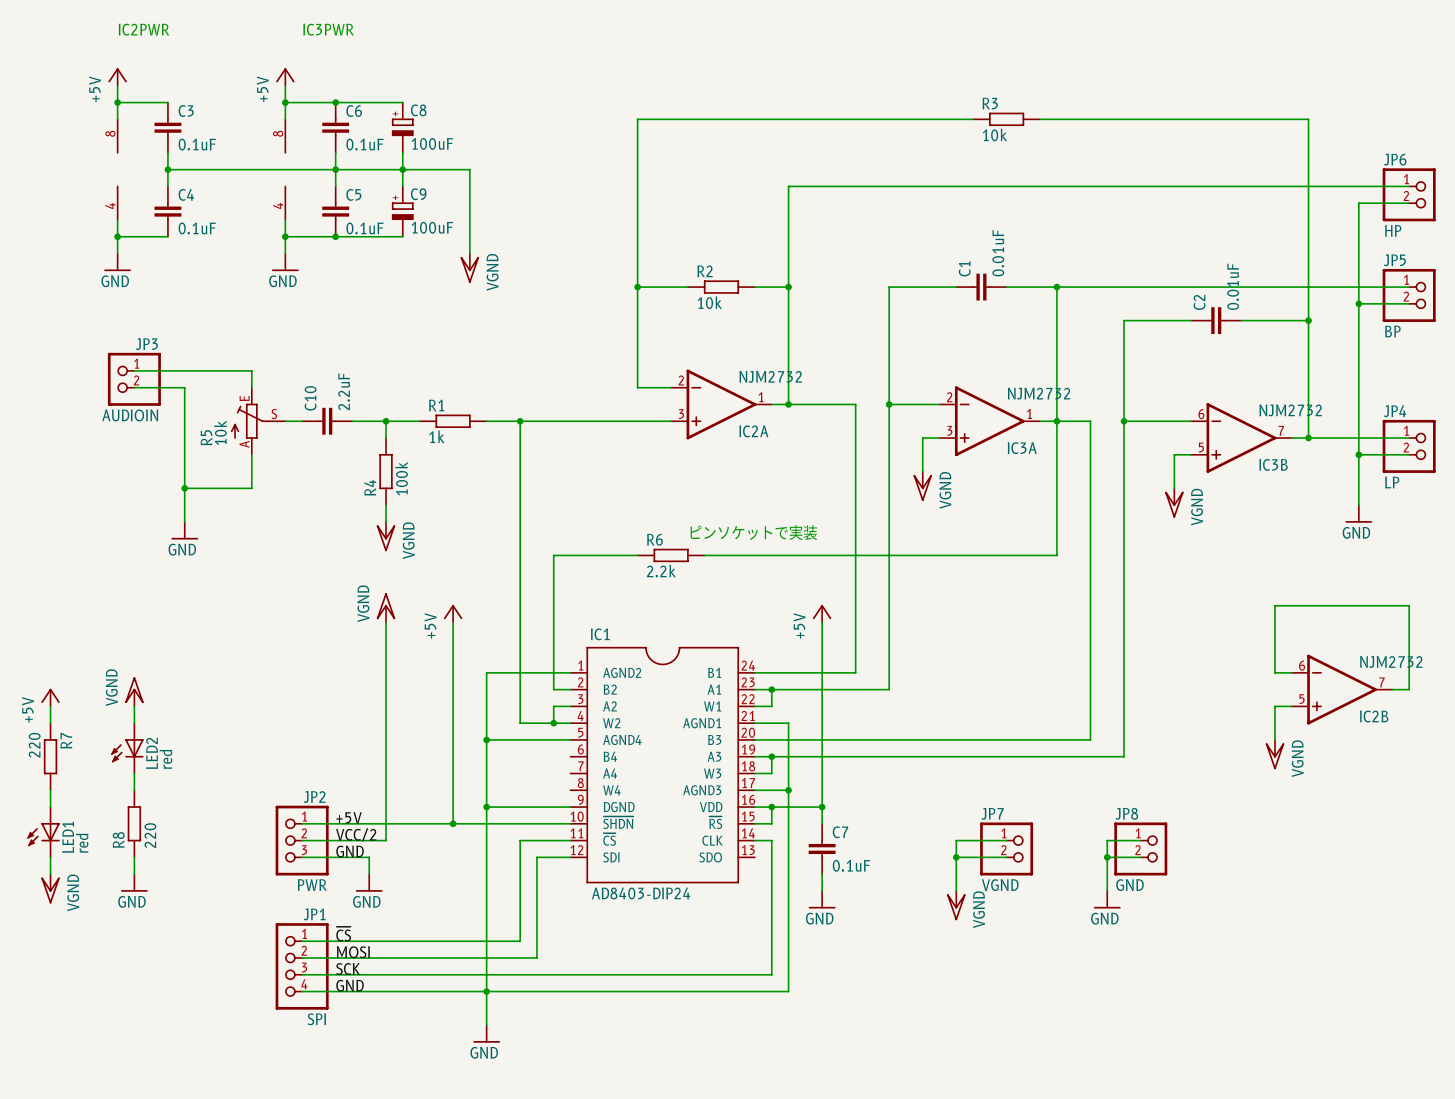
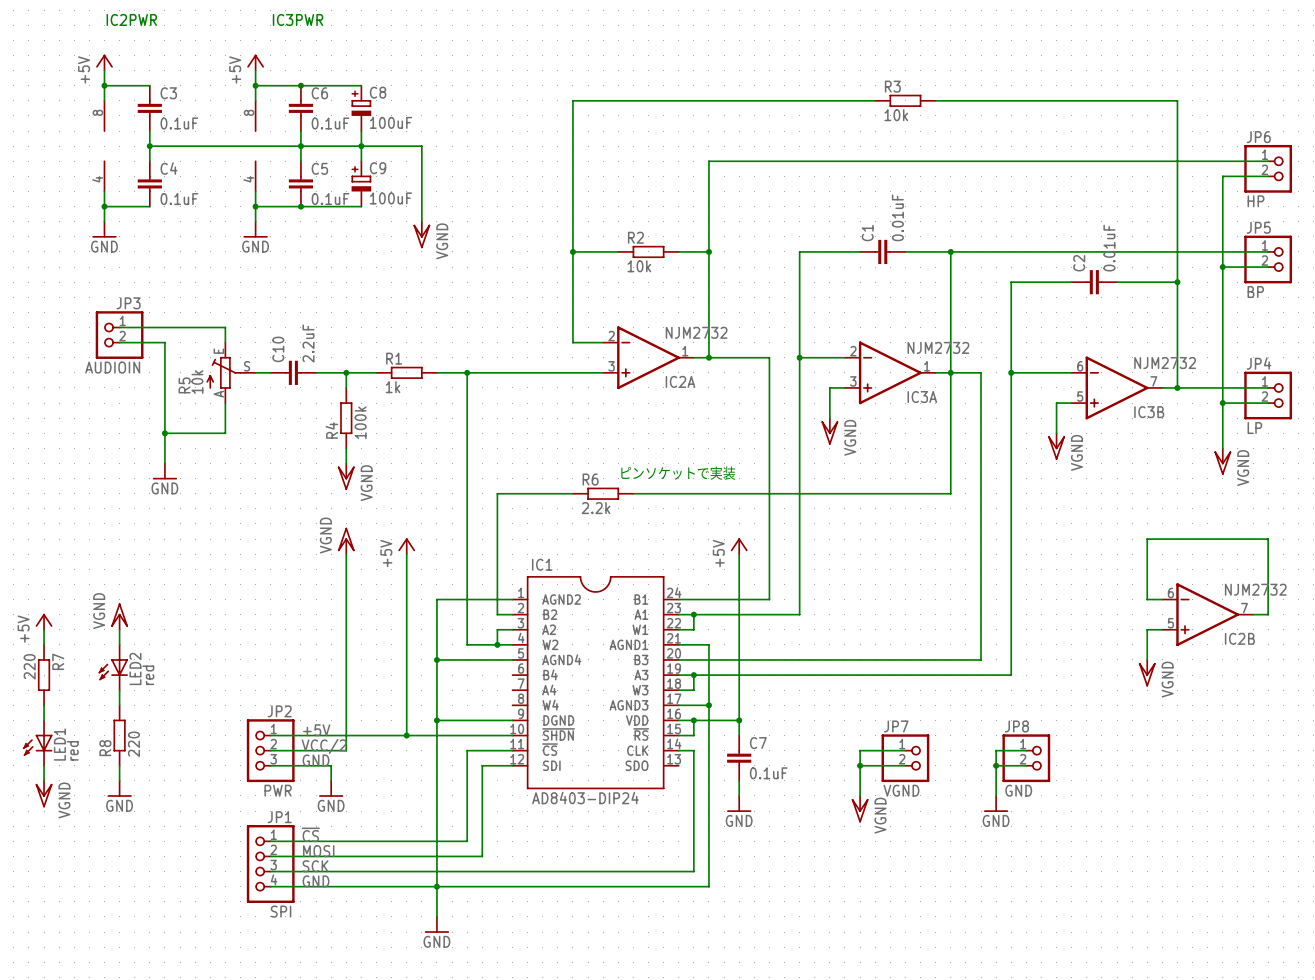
power symbol: GND (1358, 513) -> VGND (1222, 461)

